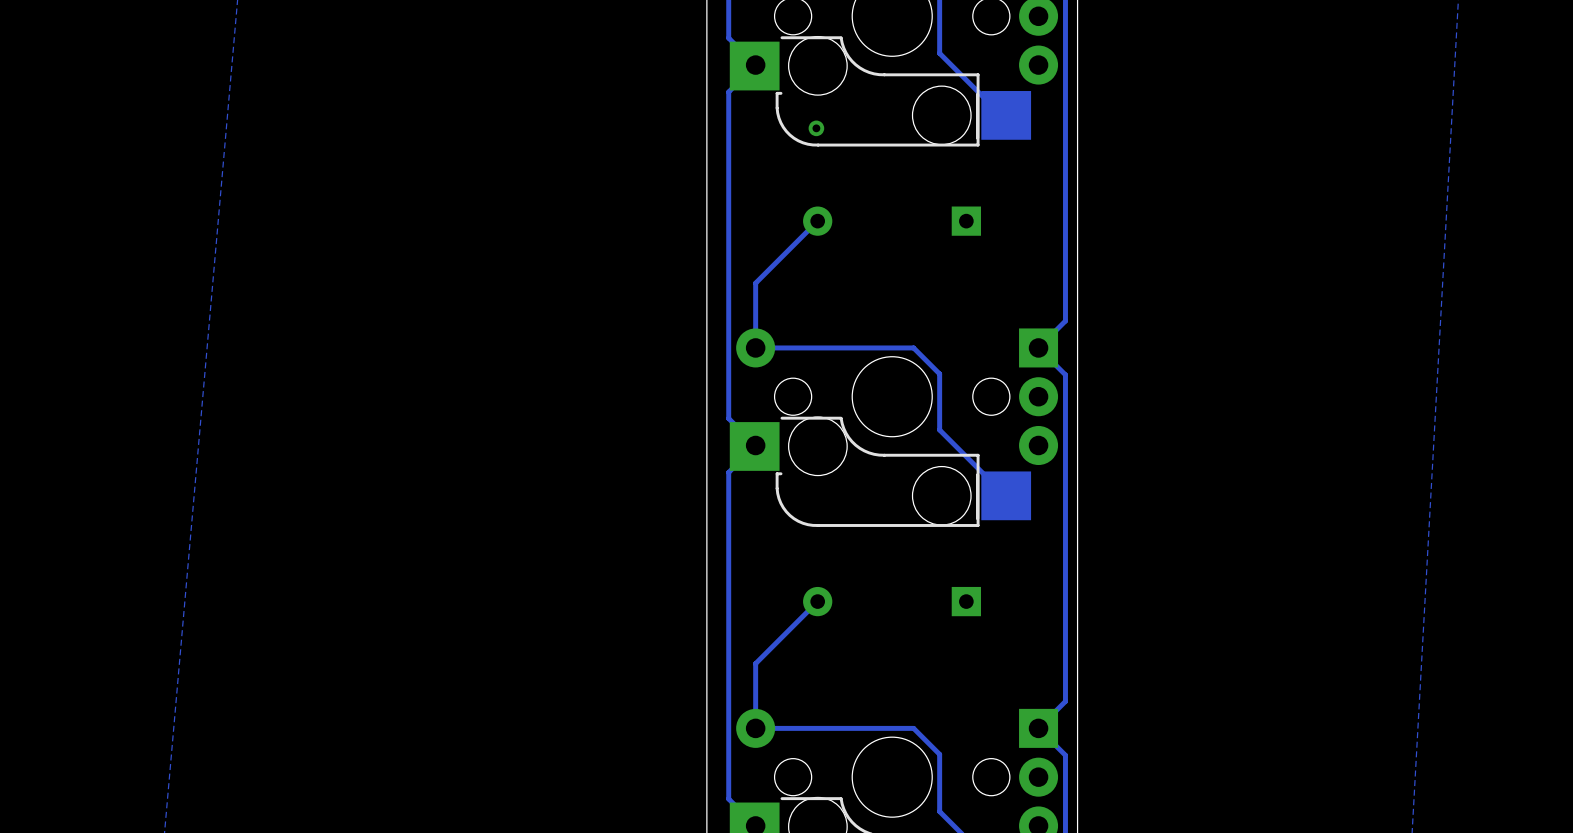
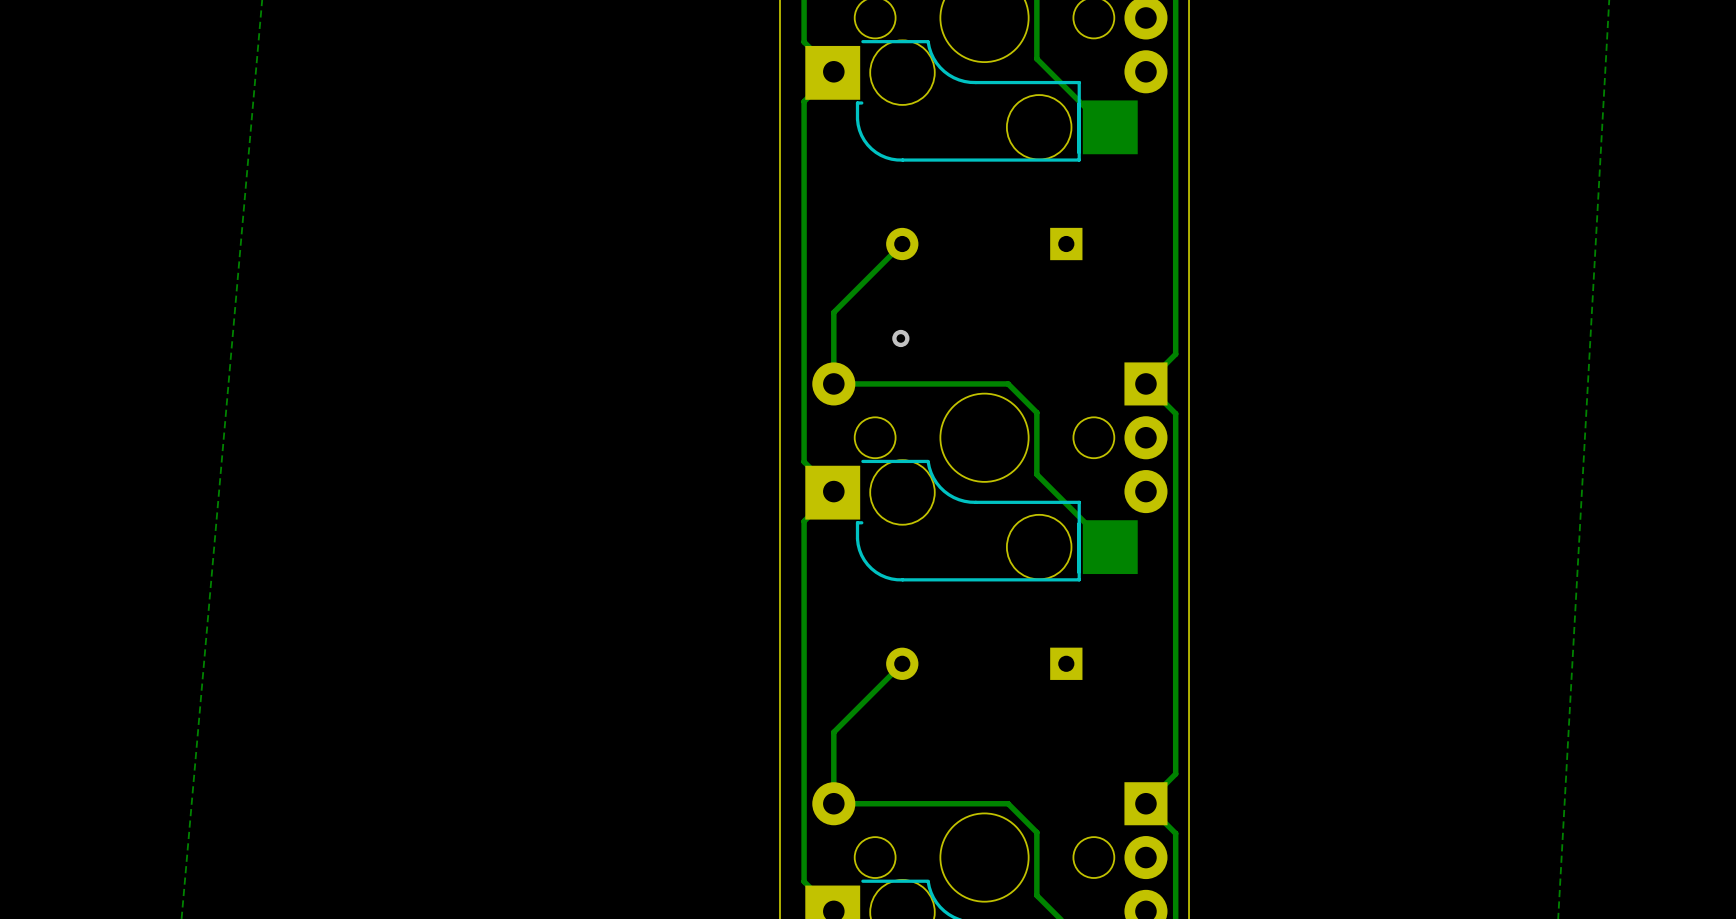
via: (816, 128) -> none
via: none -> (900, 338)

